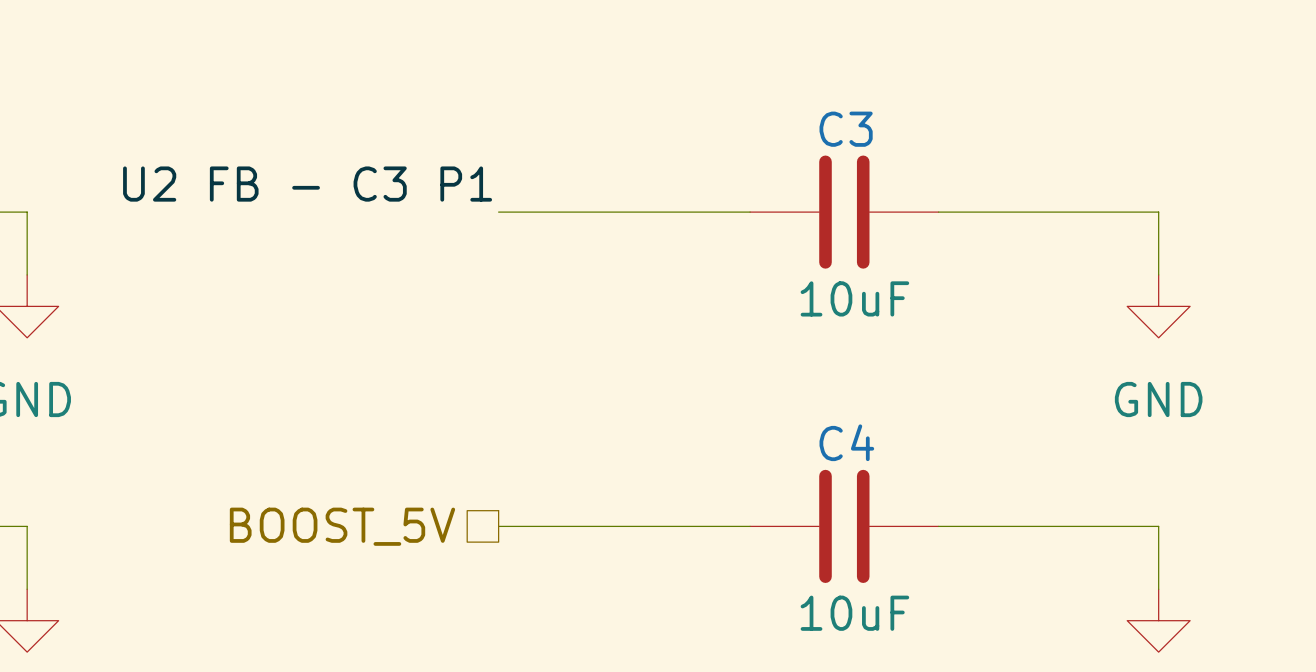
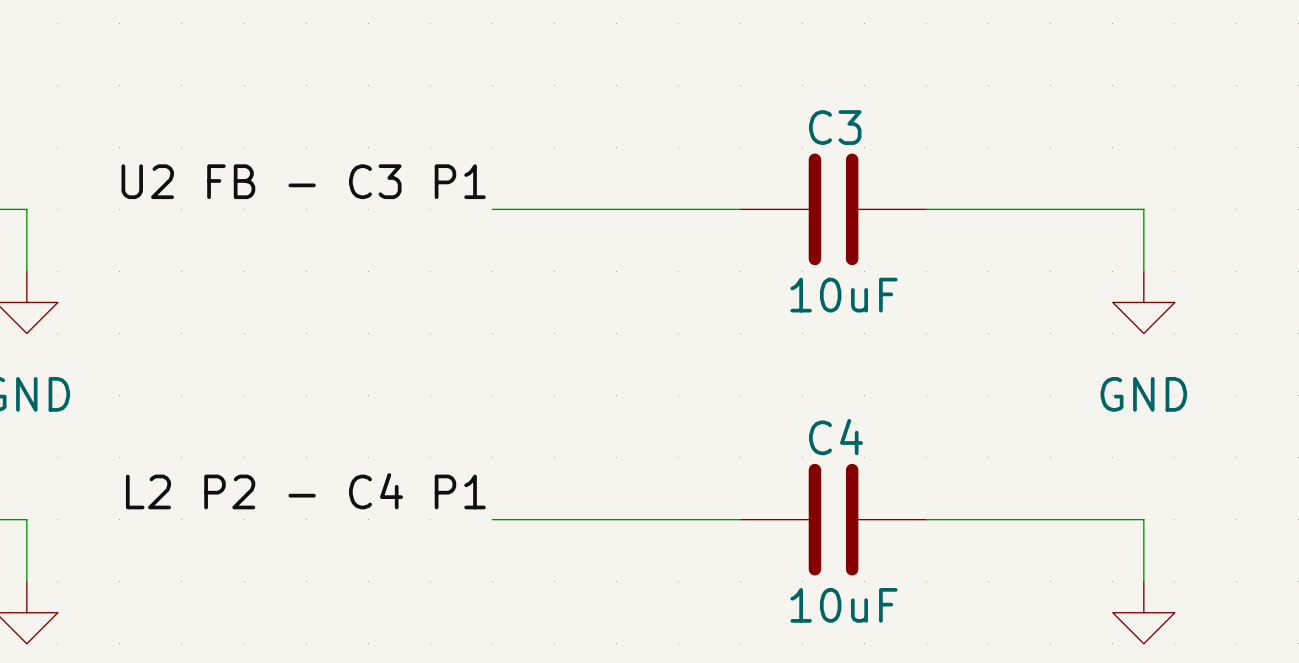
label: none -> L2 P2 - C4 P1 (305, 491)
hierarchical label: BOOST_5V (342, 526) -> none

